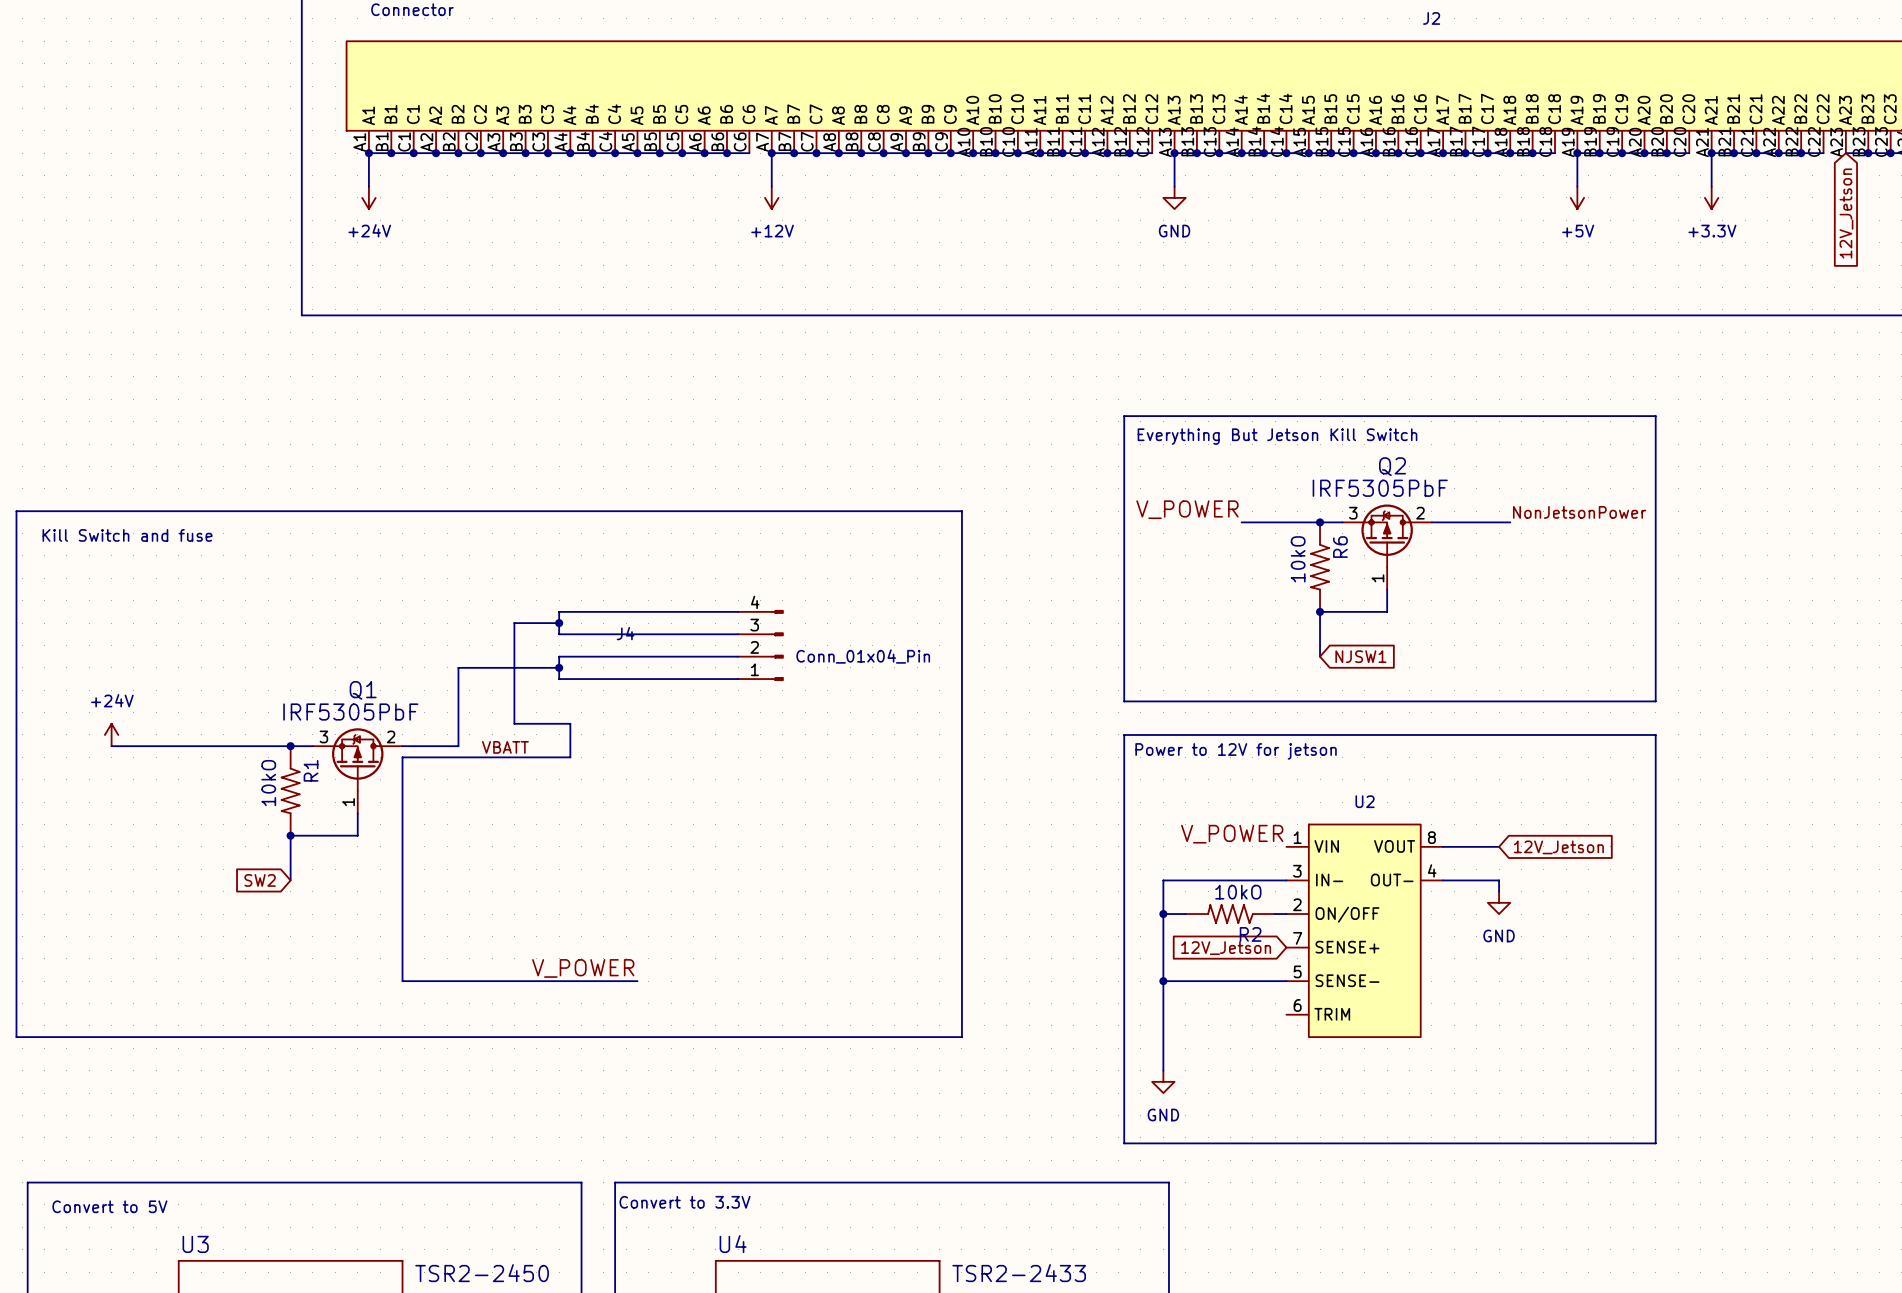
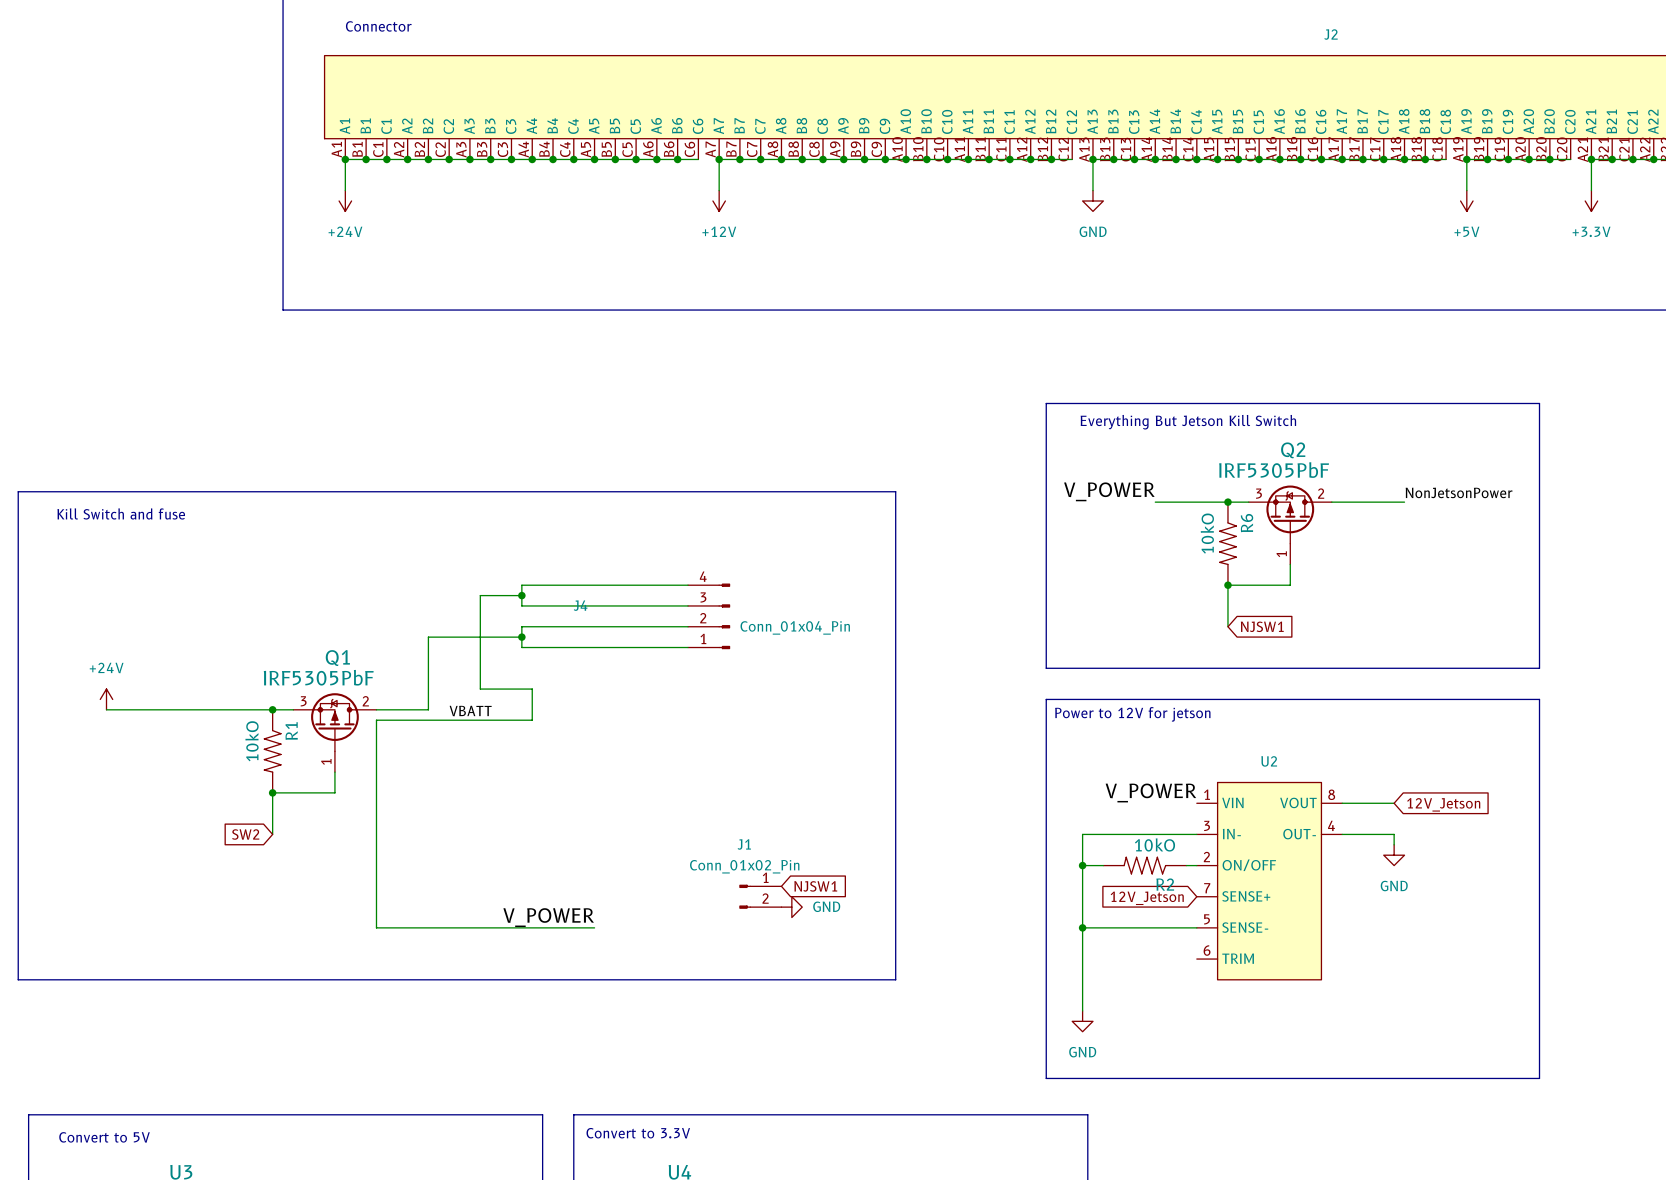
global label: none -> NJSW1 (815, 886)
J1: none -> Conn_01x02_Pin (760, 896)
power symbol: none -> GND (791, 907)

